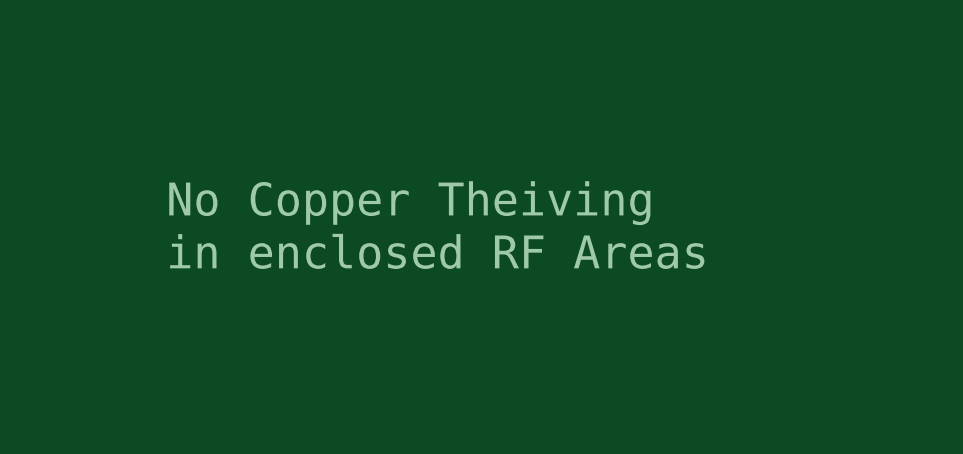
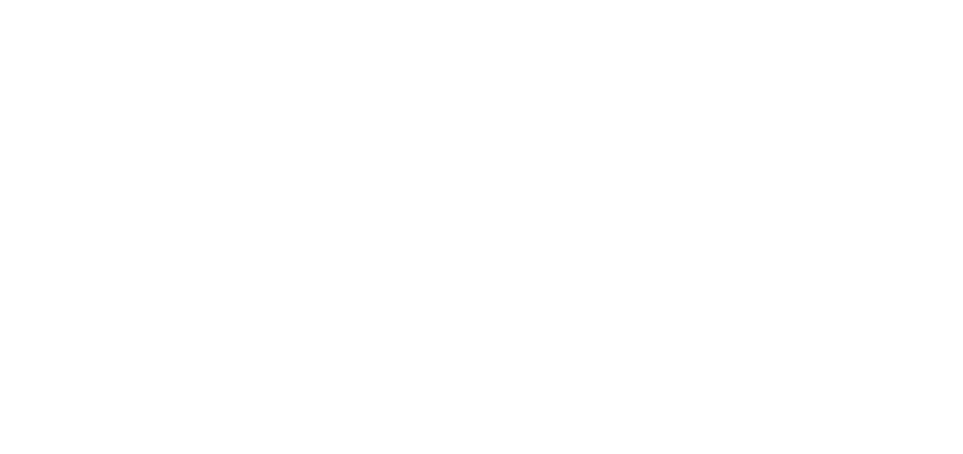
text: No Copper Theiving (409, 203) -> none
text: in enclosed RF Areas (437, 251) -> none

